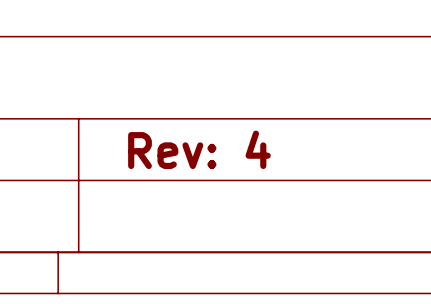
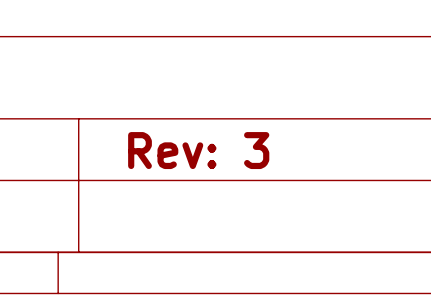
title block: Rev: 4 (199, 149) -> Rev: 3 (198, 150)

